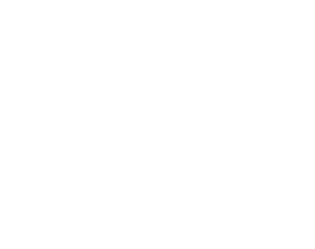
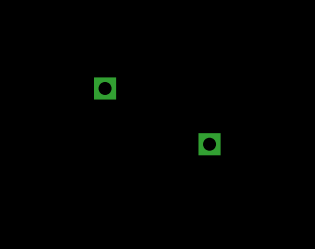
part: none -> (105, 88)
part: none -> (209, 144)

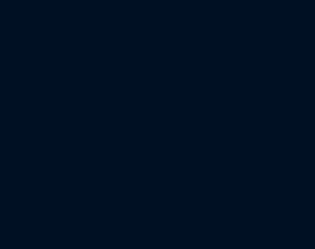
part: (105, 88) -> none
part: (209, 144) -> none

